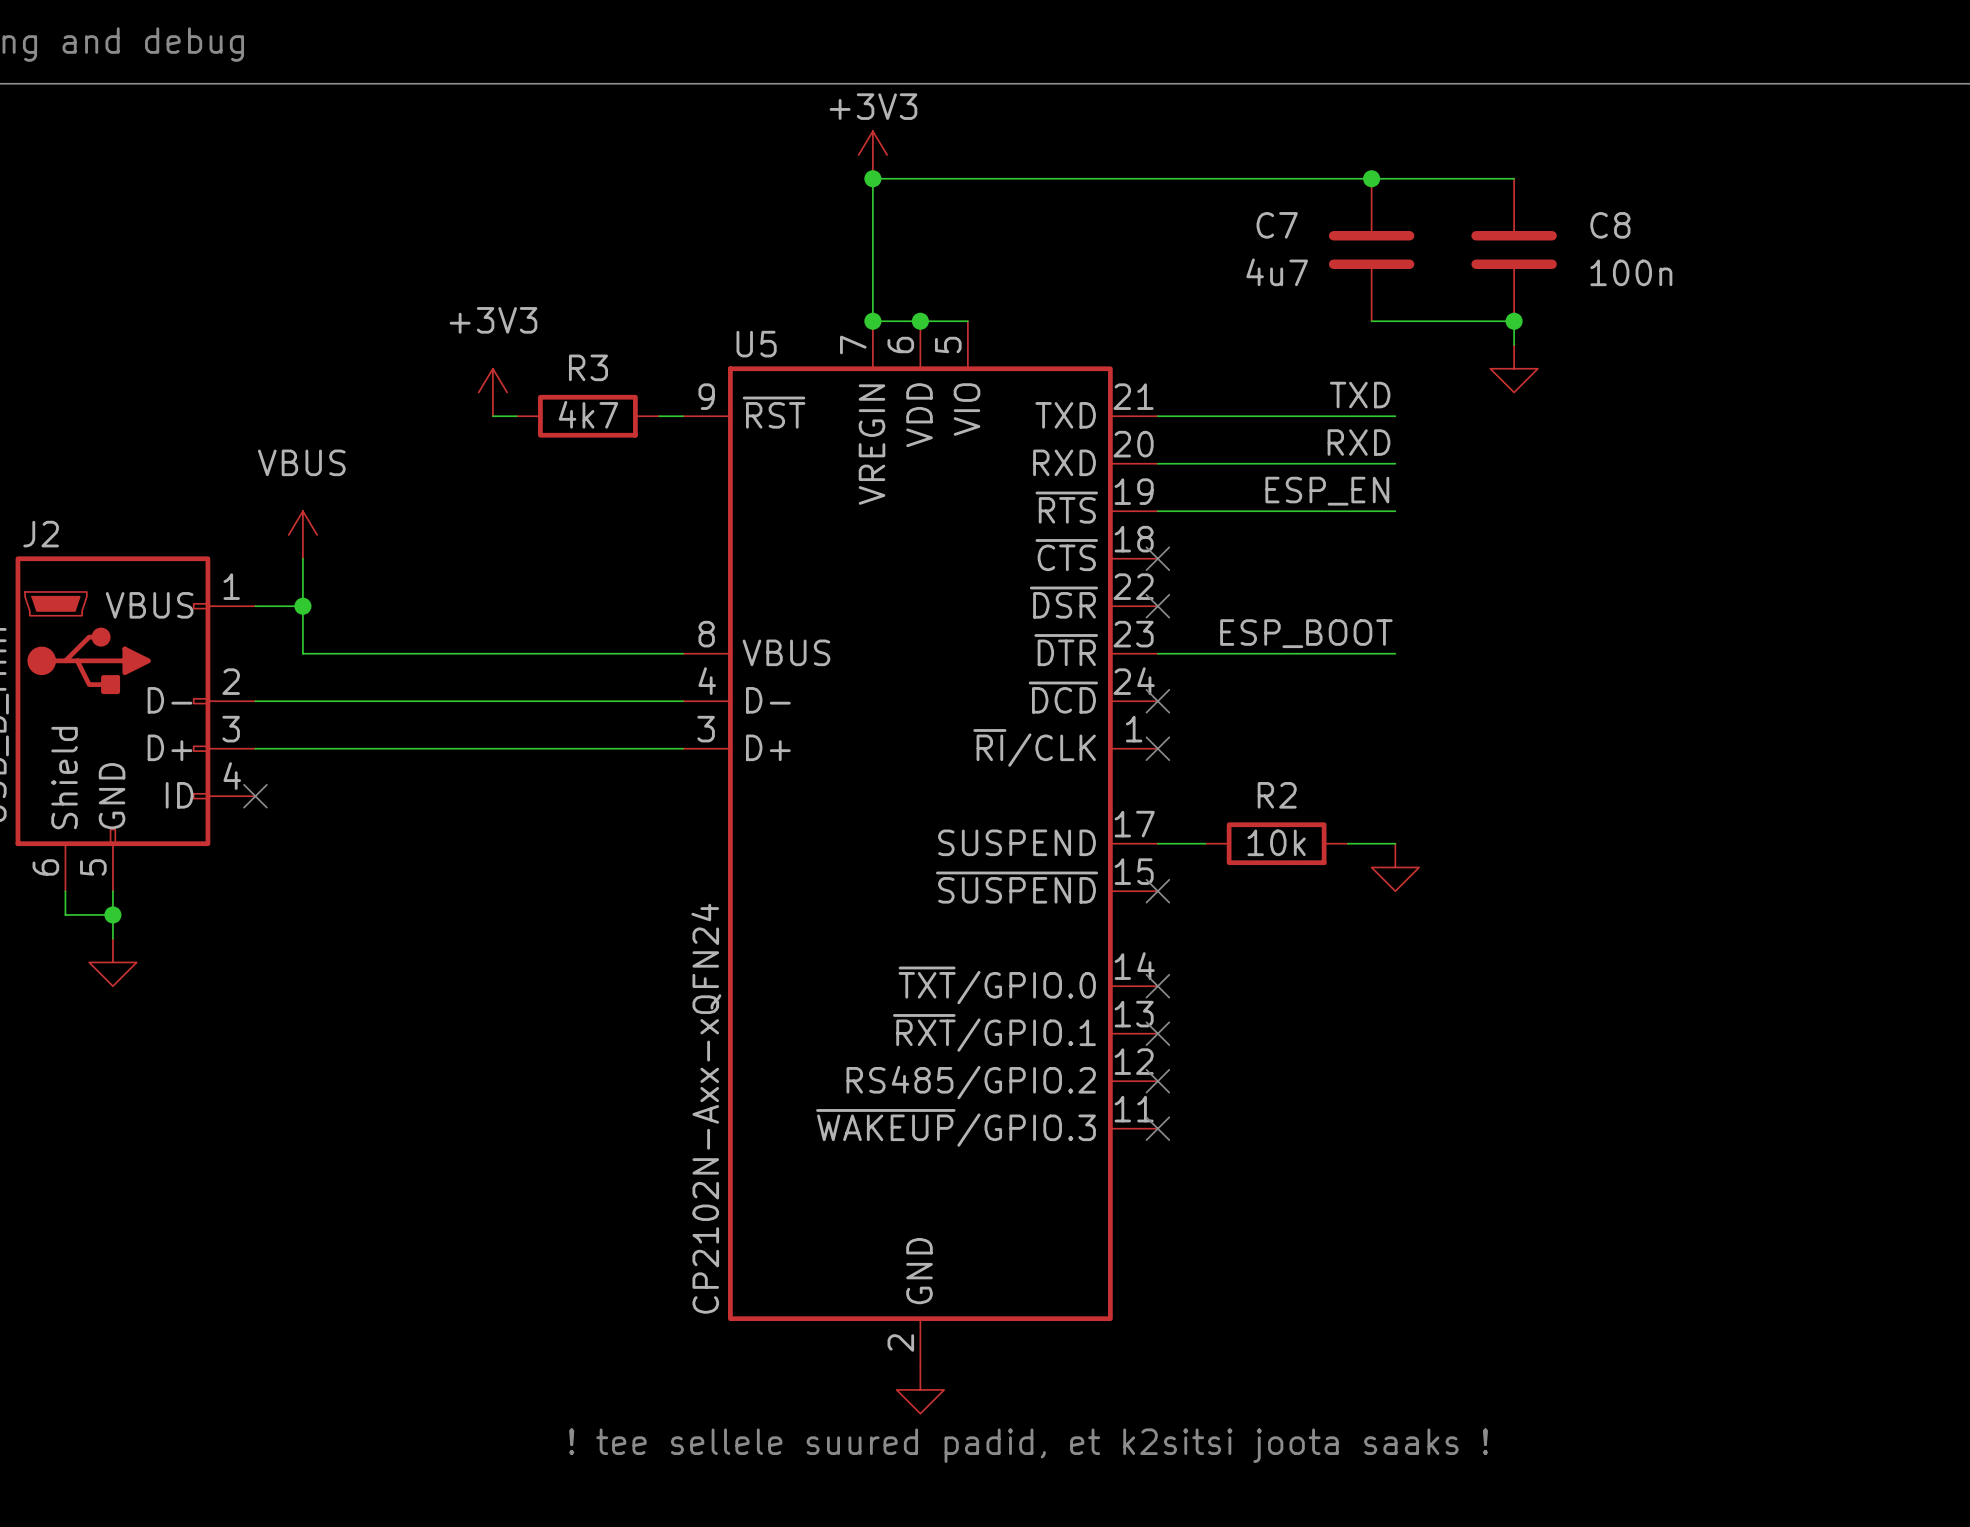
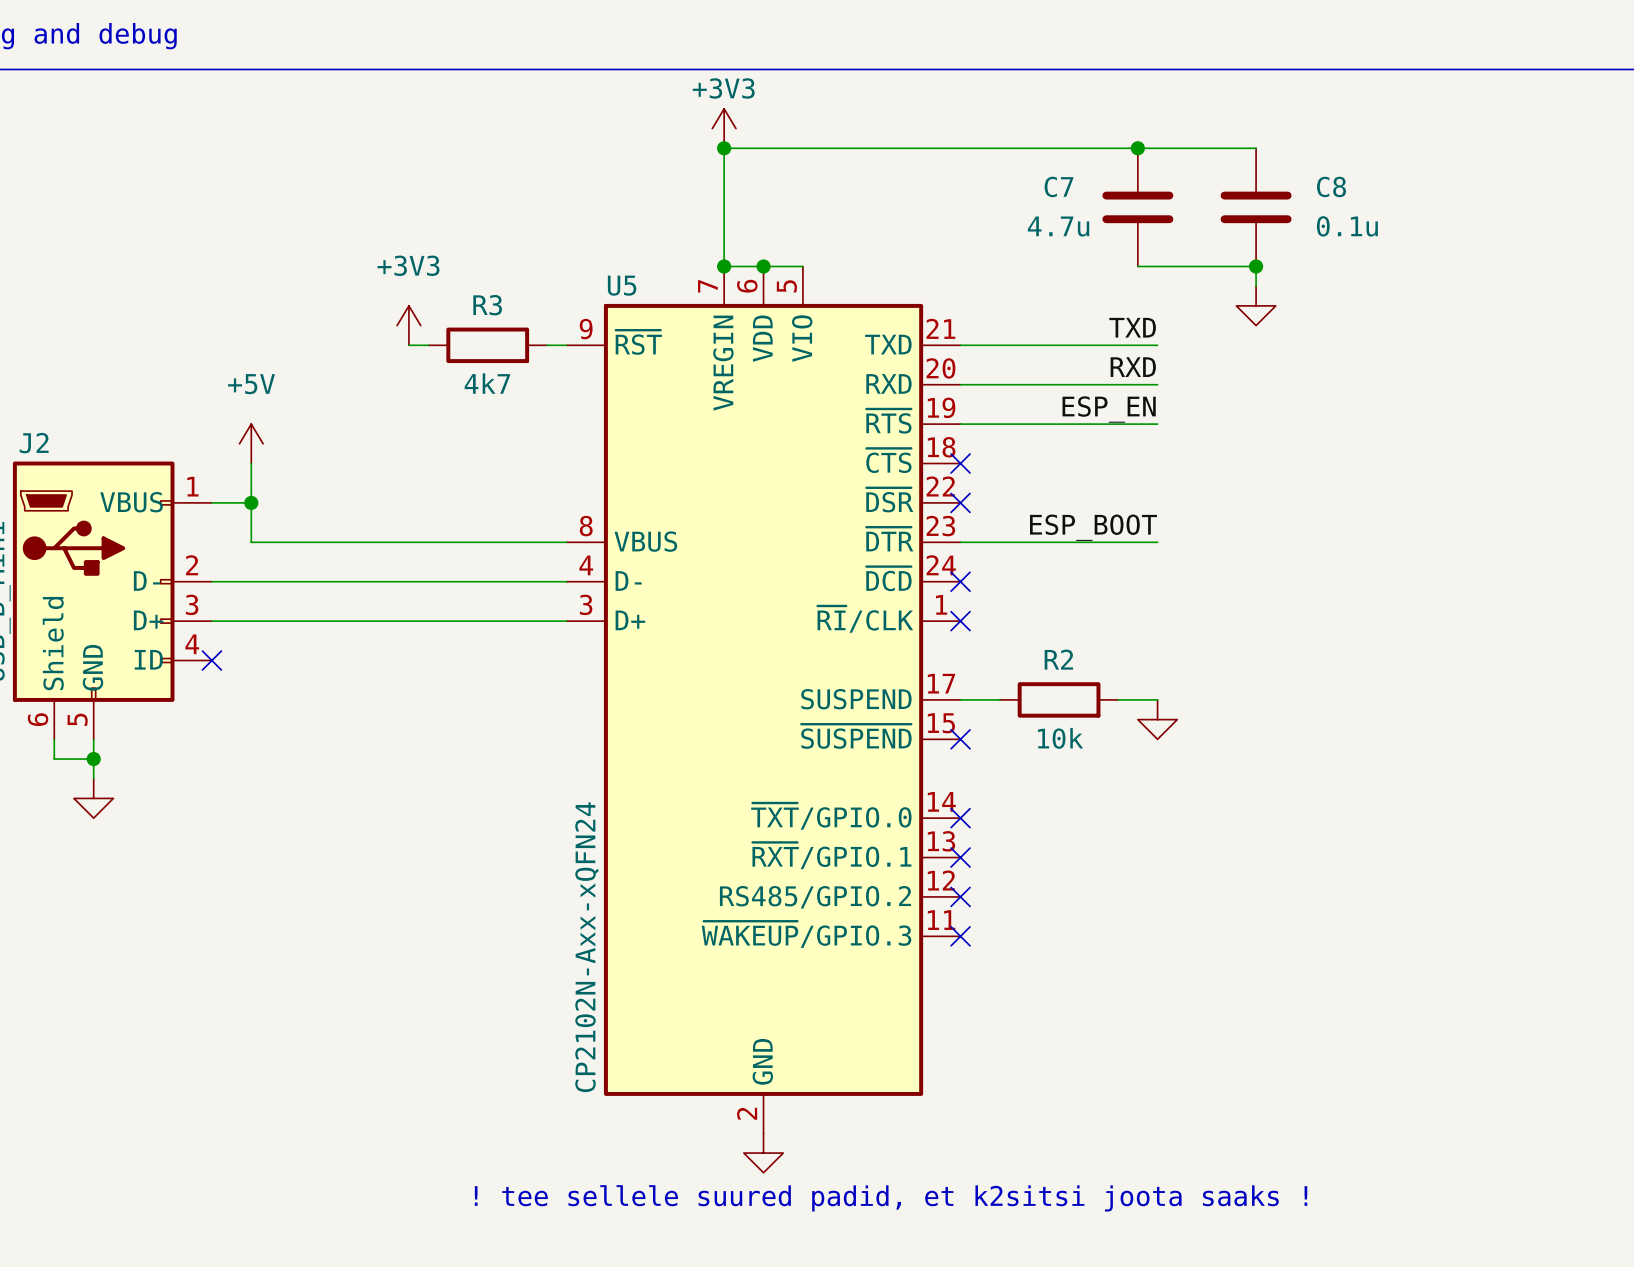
C7 value: 4u7 (1277, 272) -> 4.7u (1058, 226)
C8 value: 100n (1631, 272) -> 0.1u (1347, 226)
R3 value position: 4k7 (588, 414) -> 4k7 (487, 383)
power symbol: VBUS (302, 534) -> +5V (251, 443)
R2 value position: 10k (1276, 842) -> 10k (1060, 738)

